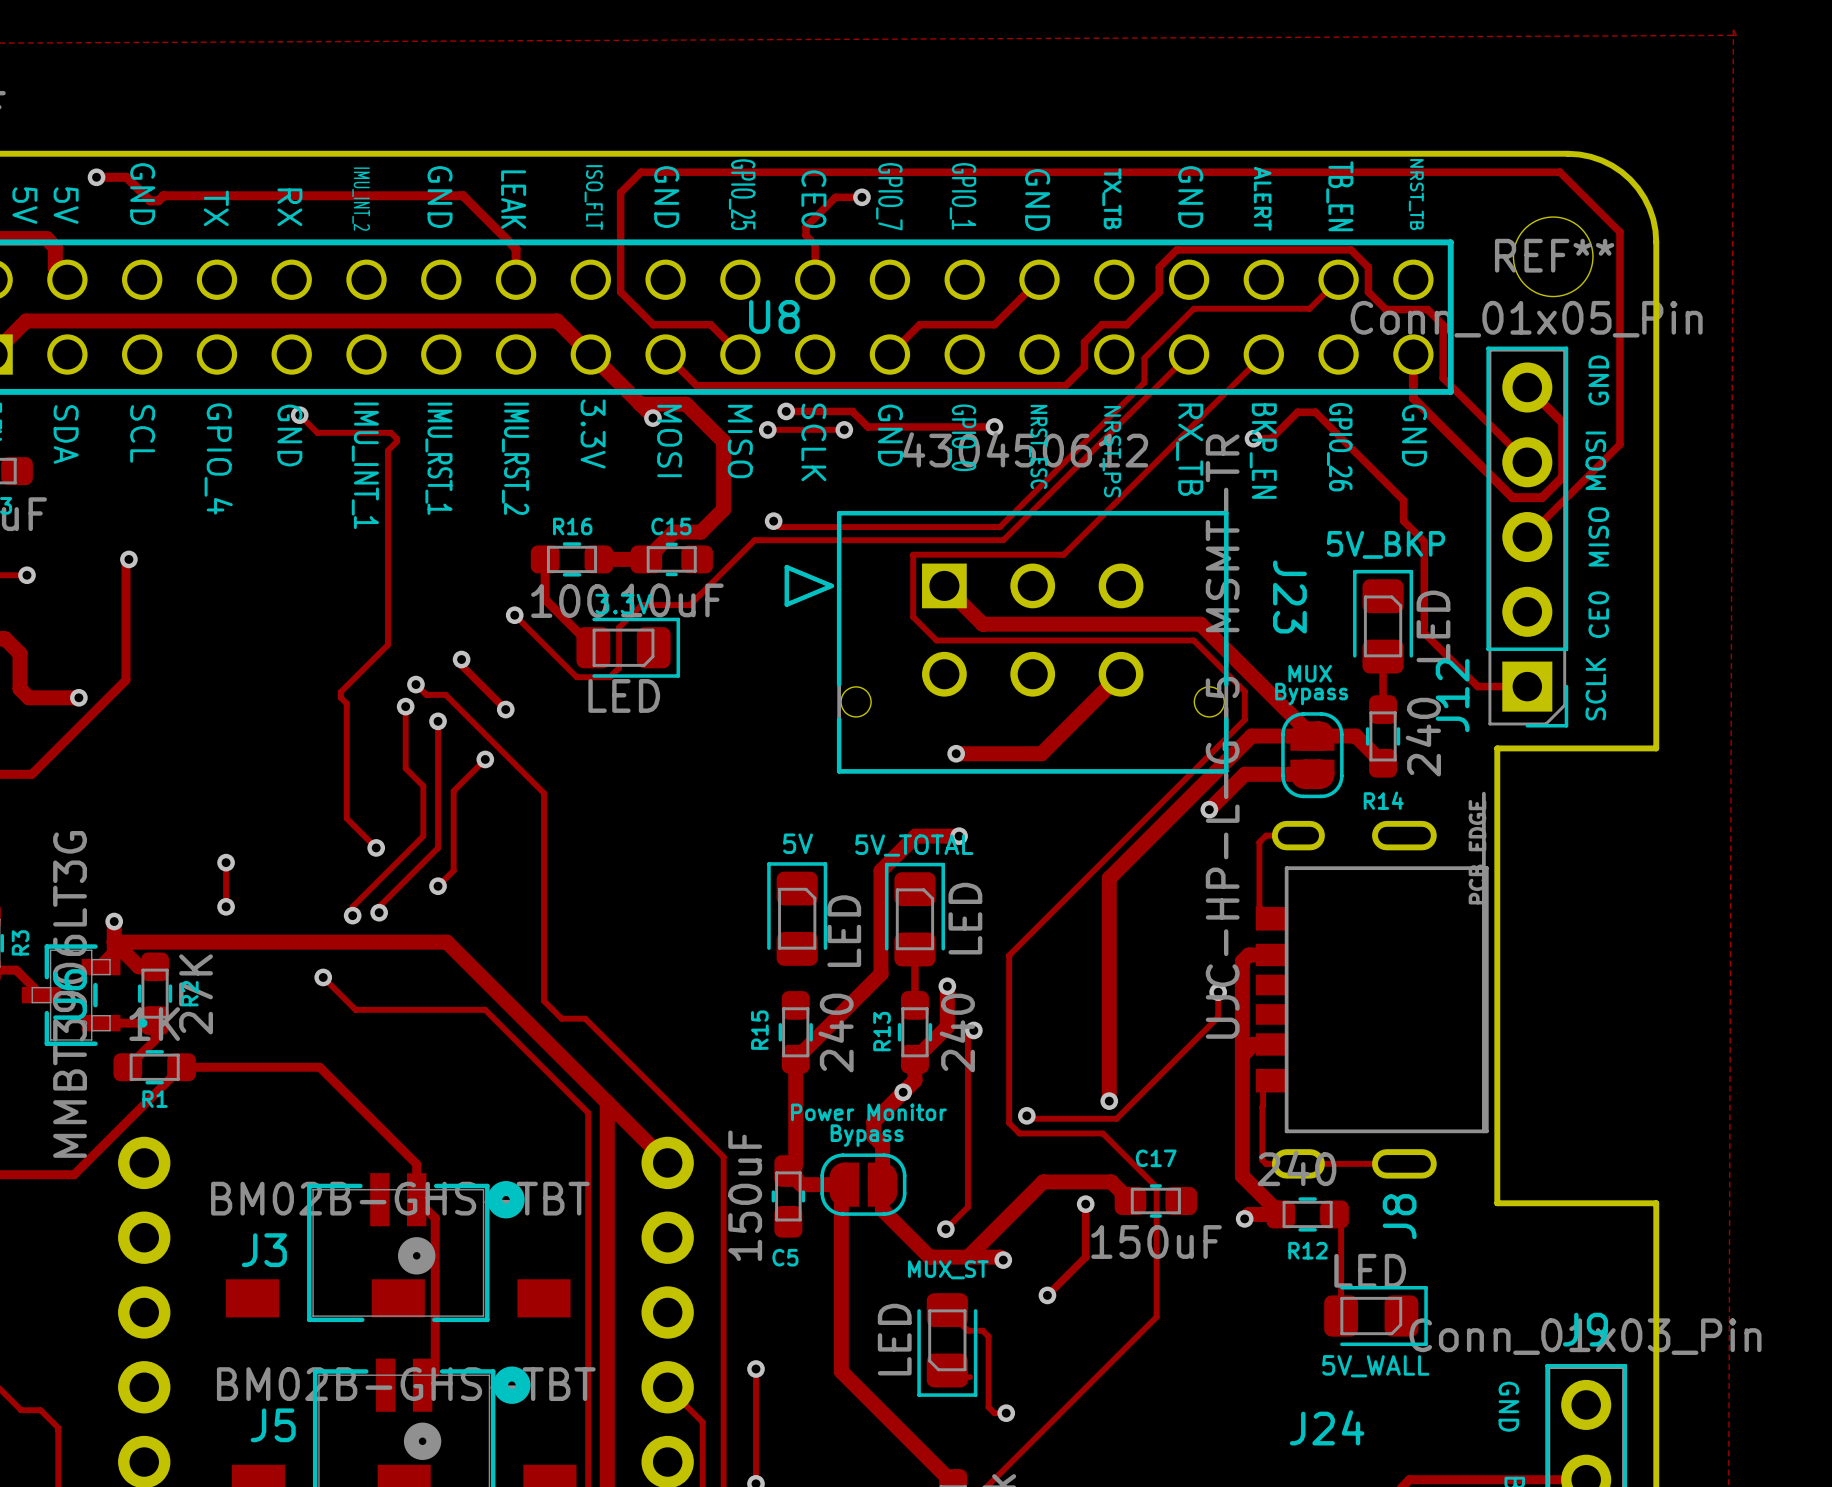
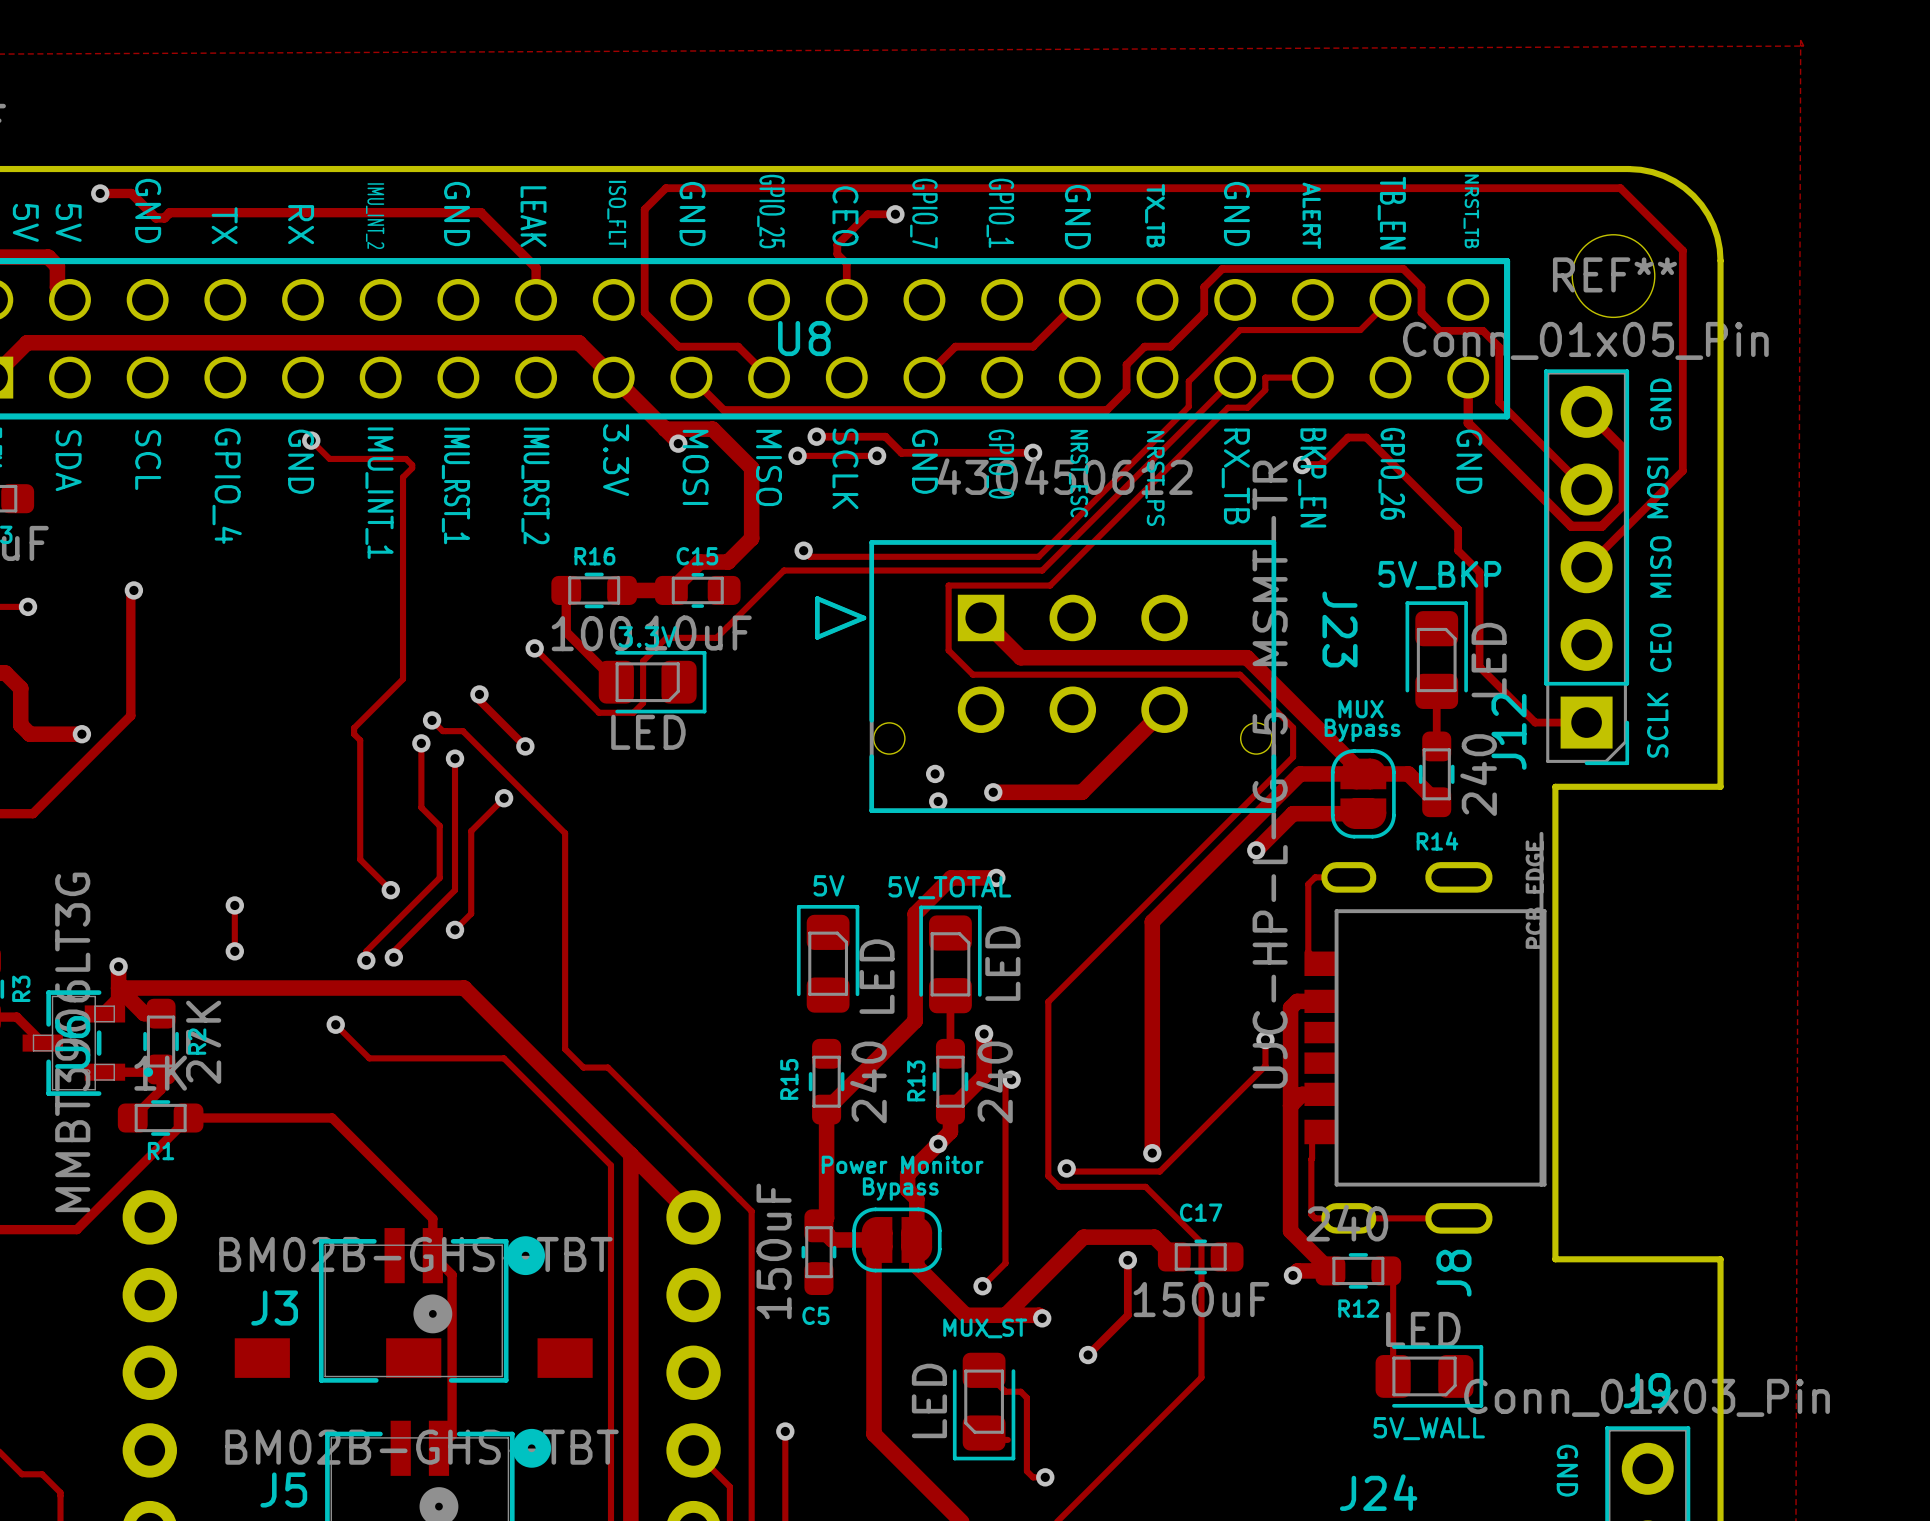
track: (1263, 354) (1063, 554) (1010, 554) -> (1312, 377) (1265, 377) (1265, 390) (1247, 407) (1228, 407) (1050, 585)
via: none -> (935, 773)
via: none -> (938, 801)

